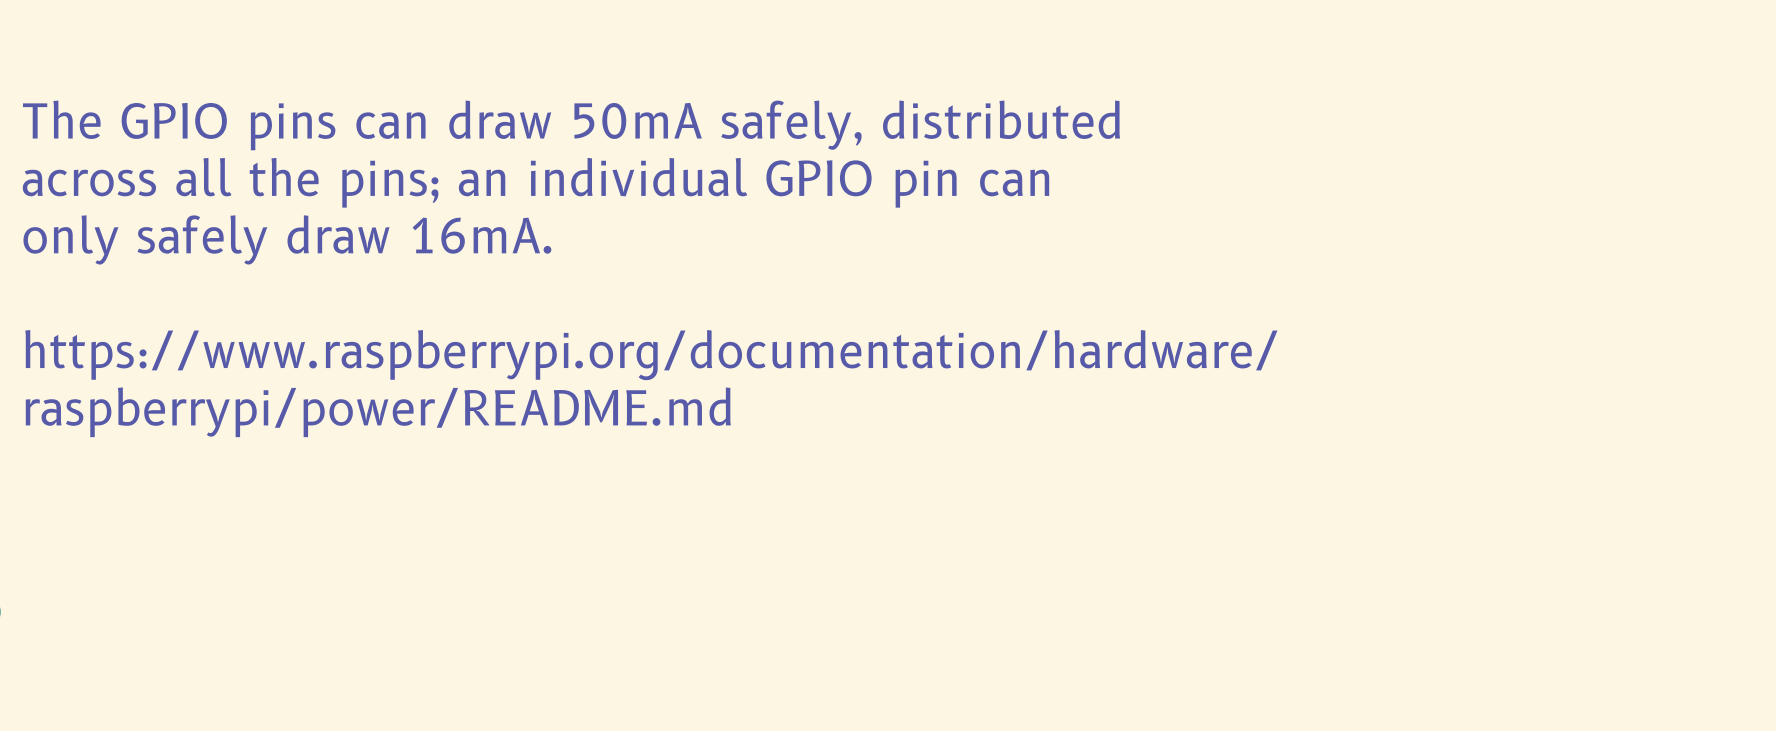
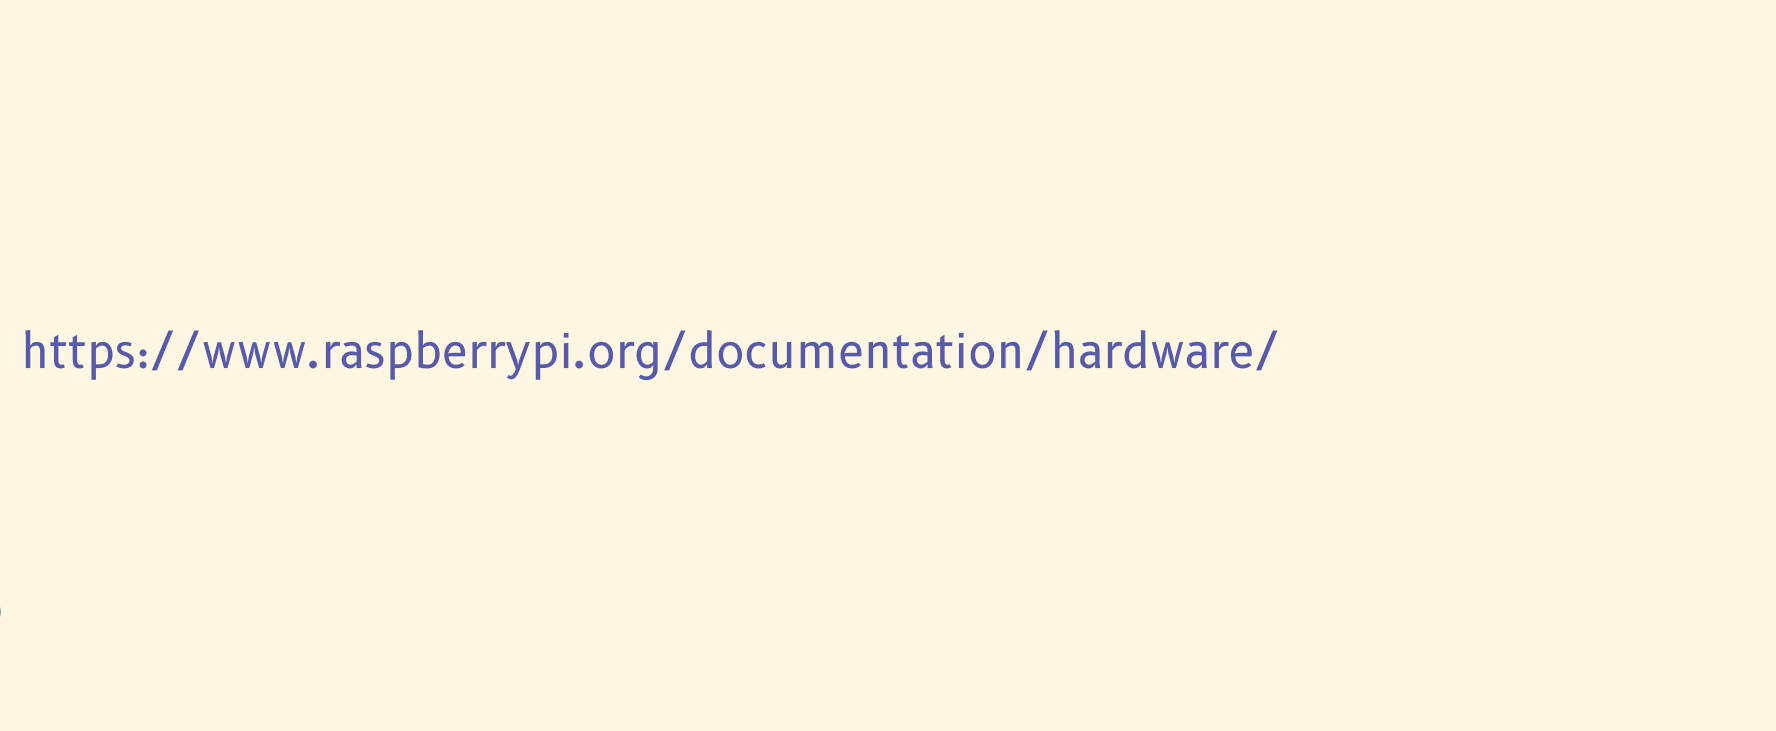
text: The GPIO pins can draw 50mA safely, distributed (571, 125) -> none
text: across all the pins; an individual GPIO pin can (535, 182) -> none
text: only safely draw 16mA. (287, 239) -> none
text: raspberrypi/power/README.md (378, 412) -> none

